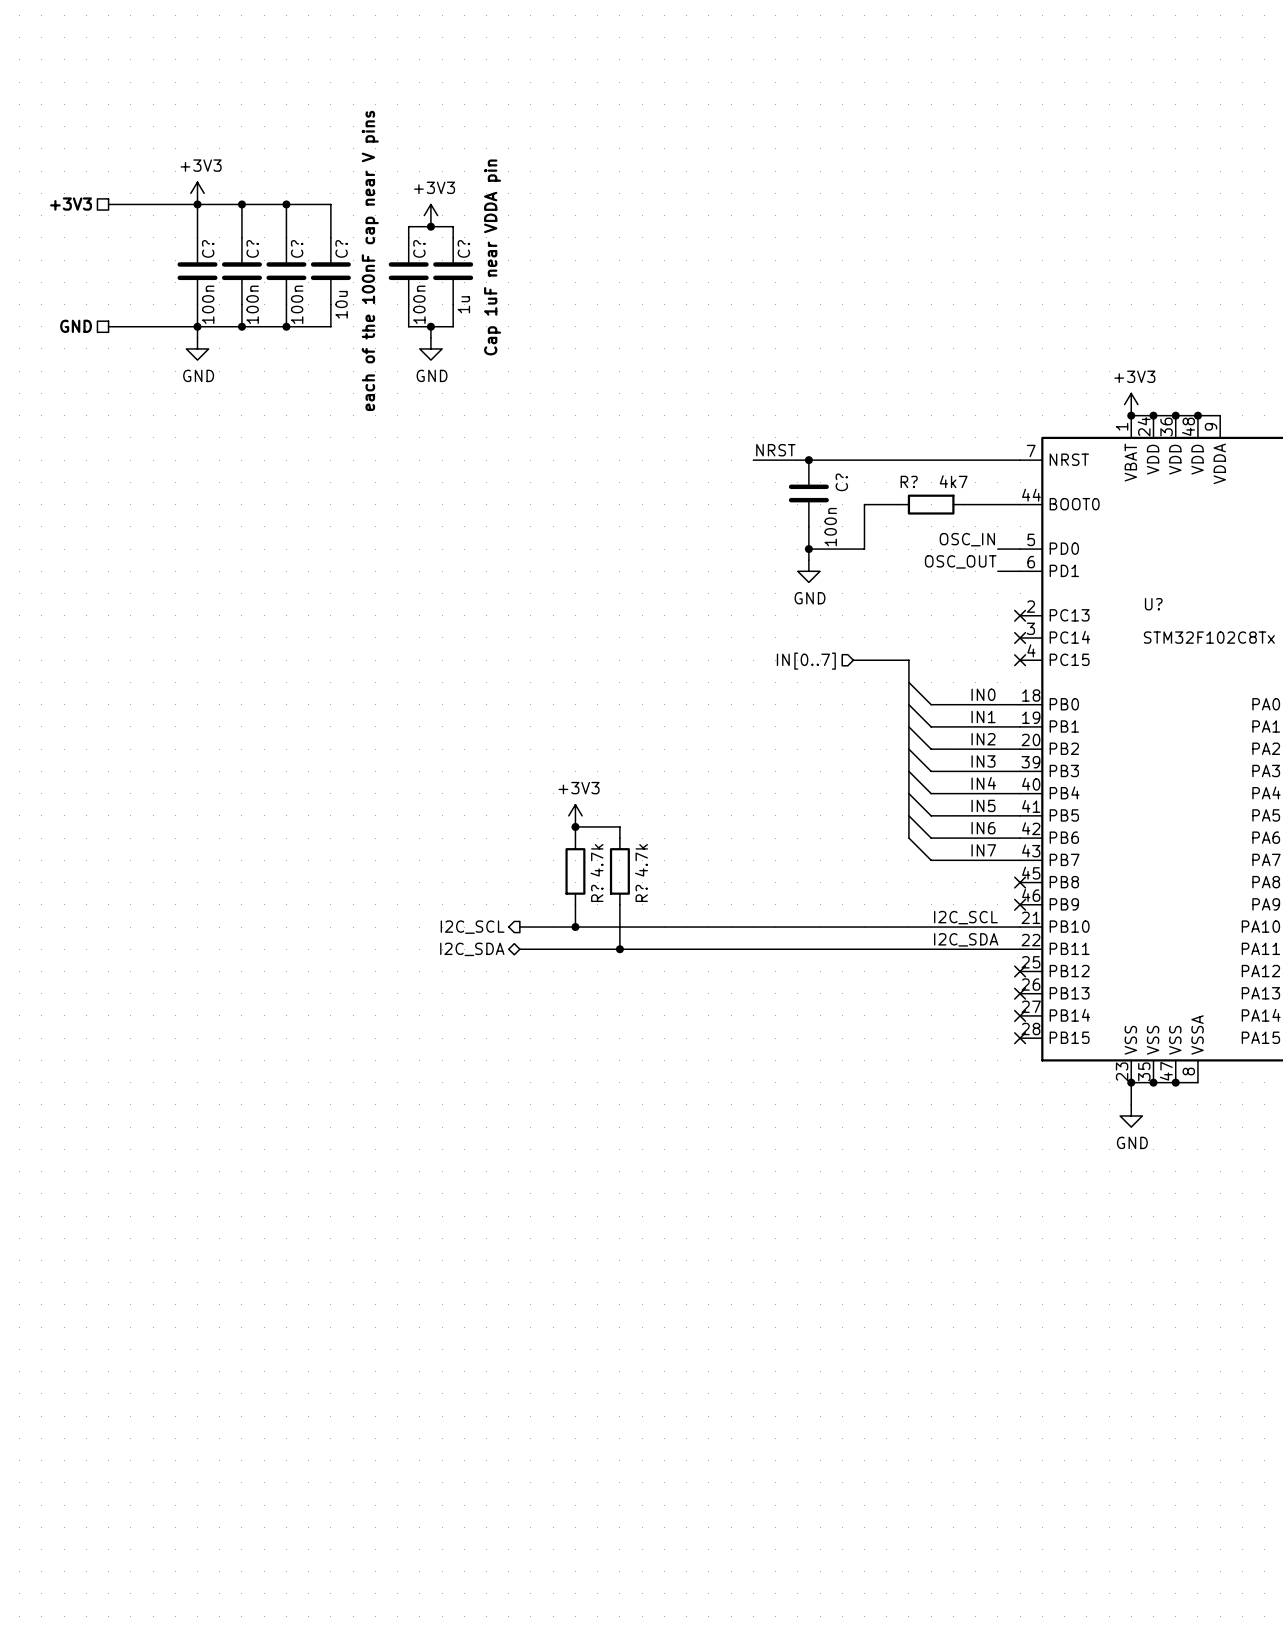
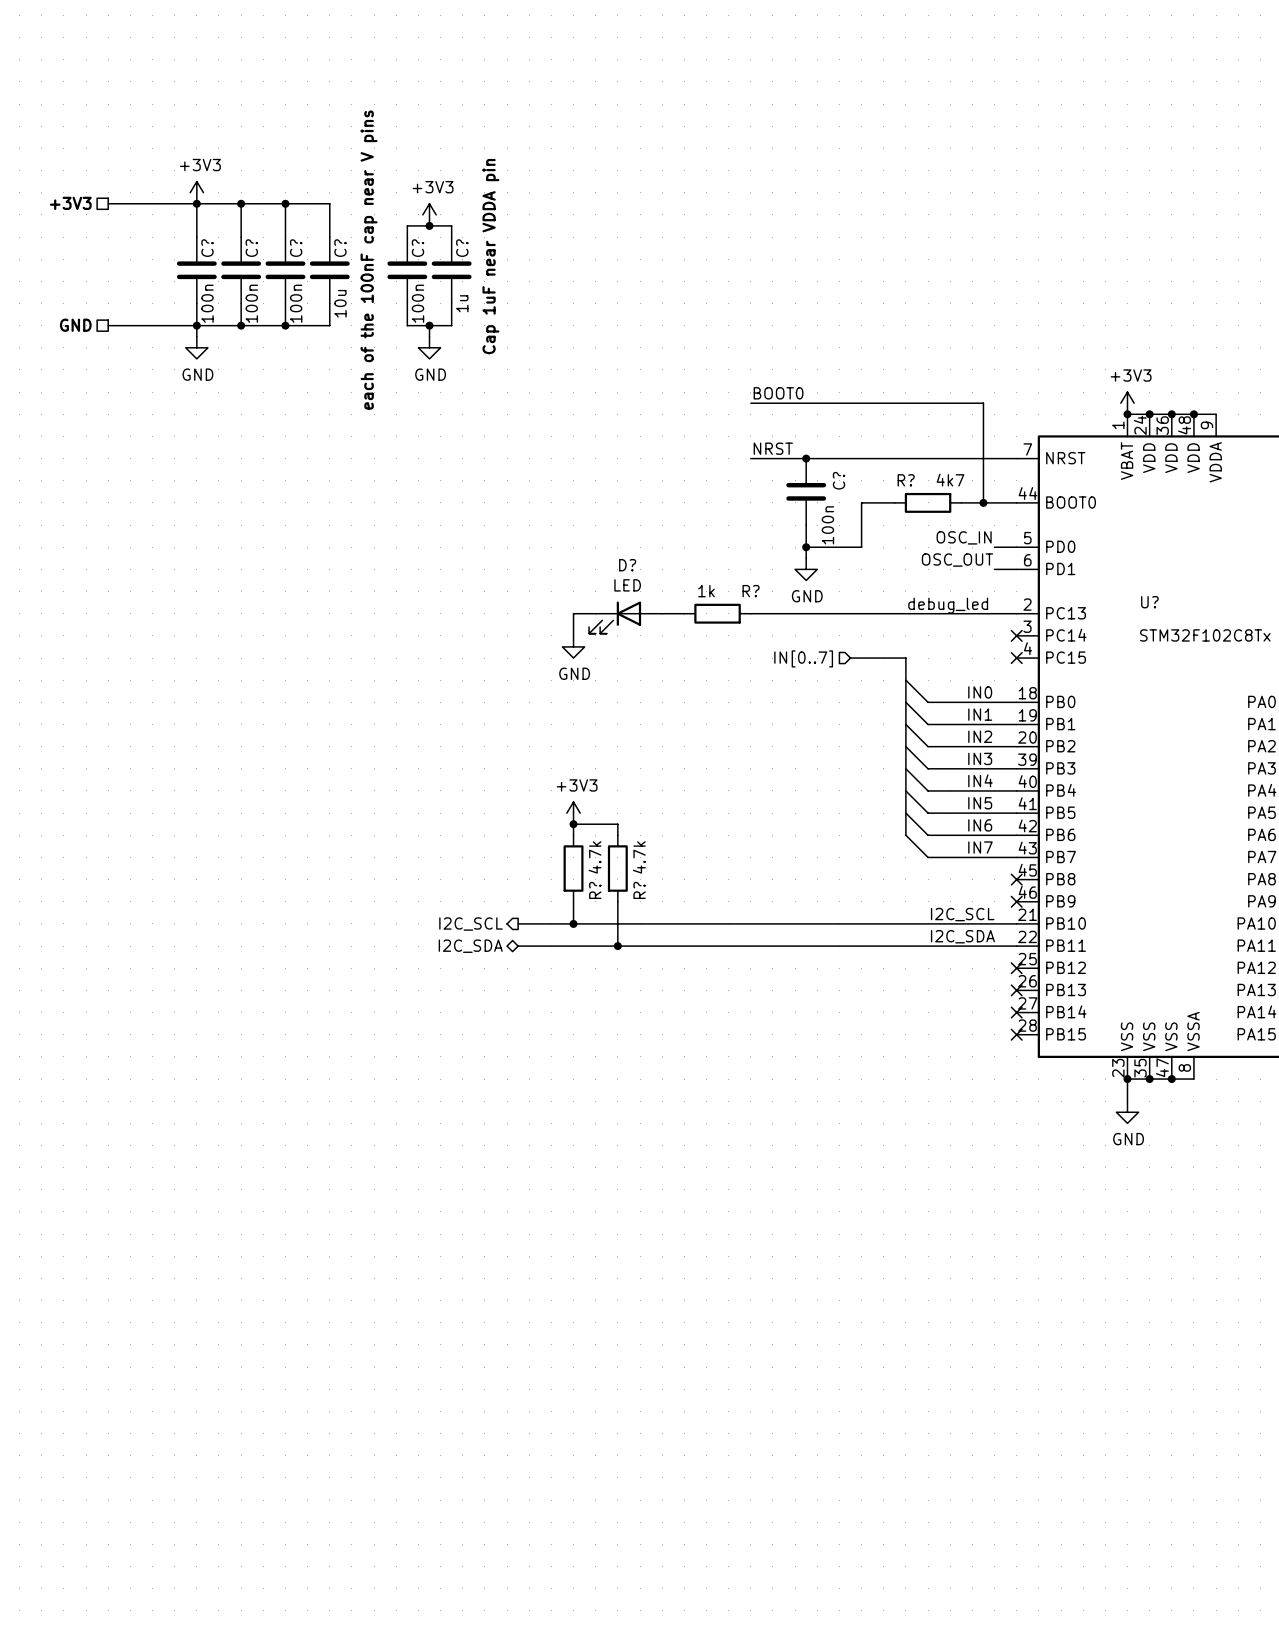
label: none -> BOOT0 (778, 393)
wire: none -> (750, 403) (983, 403) (983, 502)
junction: none -> (983, 502)
label: none -> debug_led (948, 605)
wire: none -> (595, 613) (573, 613) (573, 635)
wire: none -> (662, 613) (684, 613)
R?: none -> 1k (717, 613)
wire: none -> (750, 613) (1016, 613)
no-connect mark: (1020, 615) -> none
D?: none -> LED (625, 617)
power symbol: none -> GND (573, 646)

